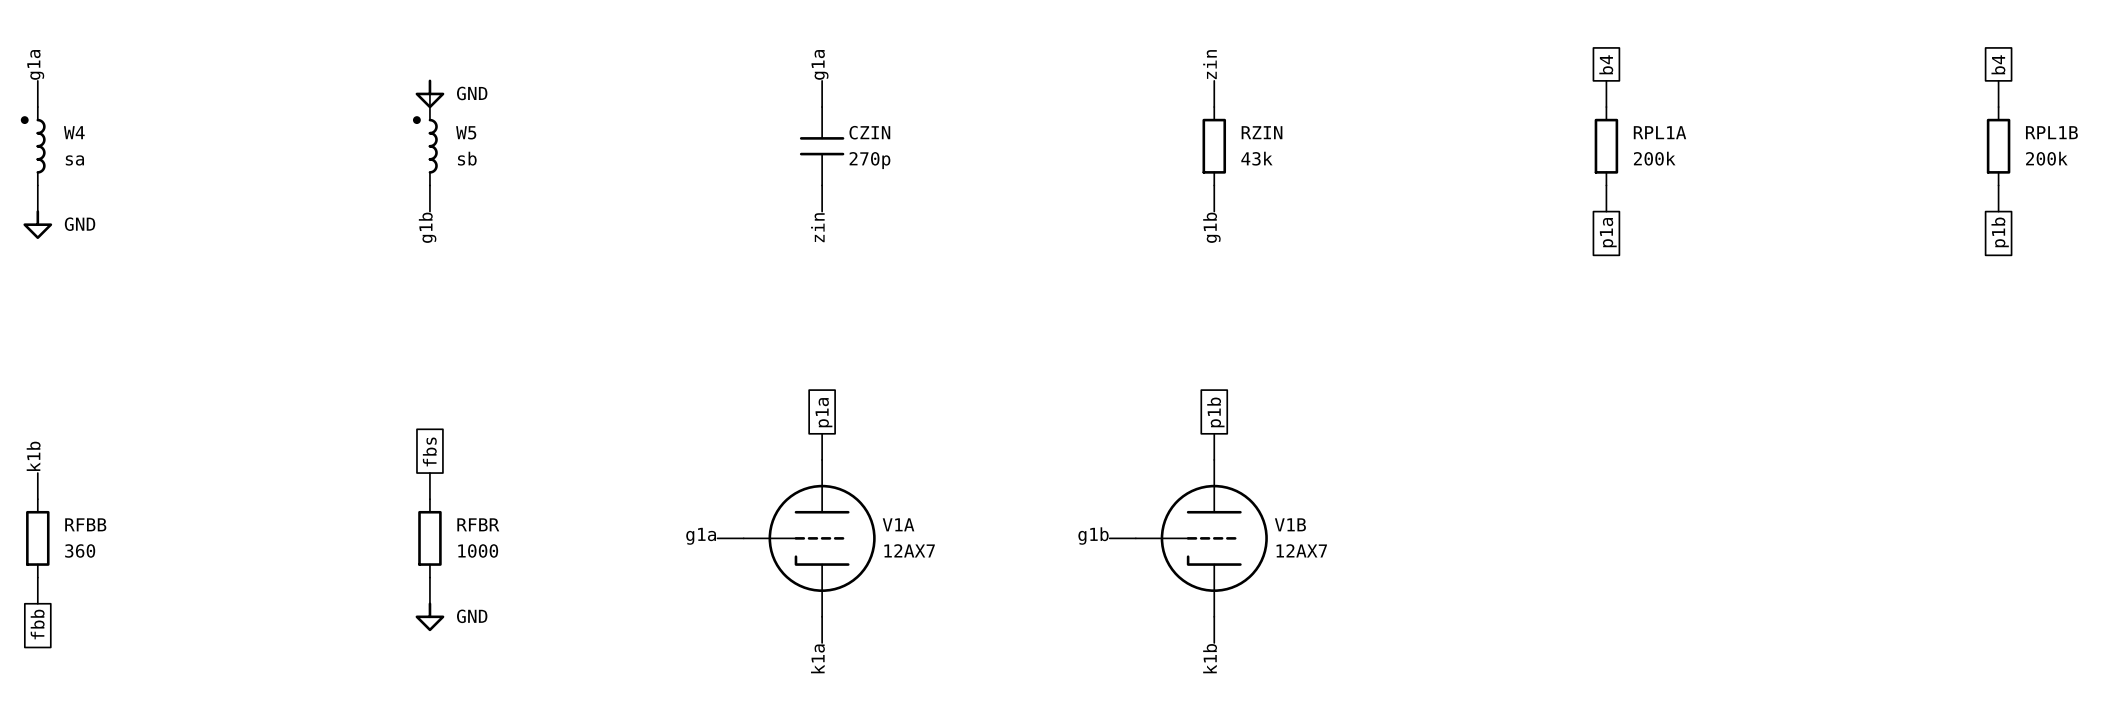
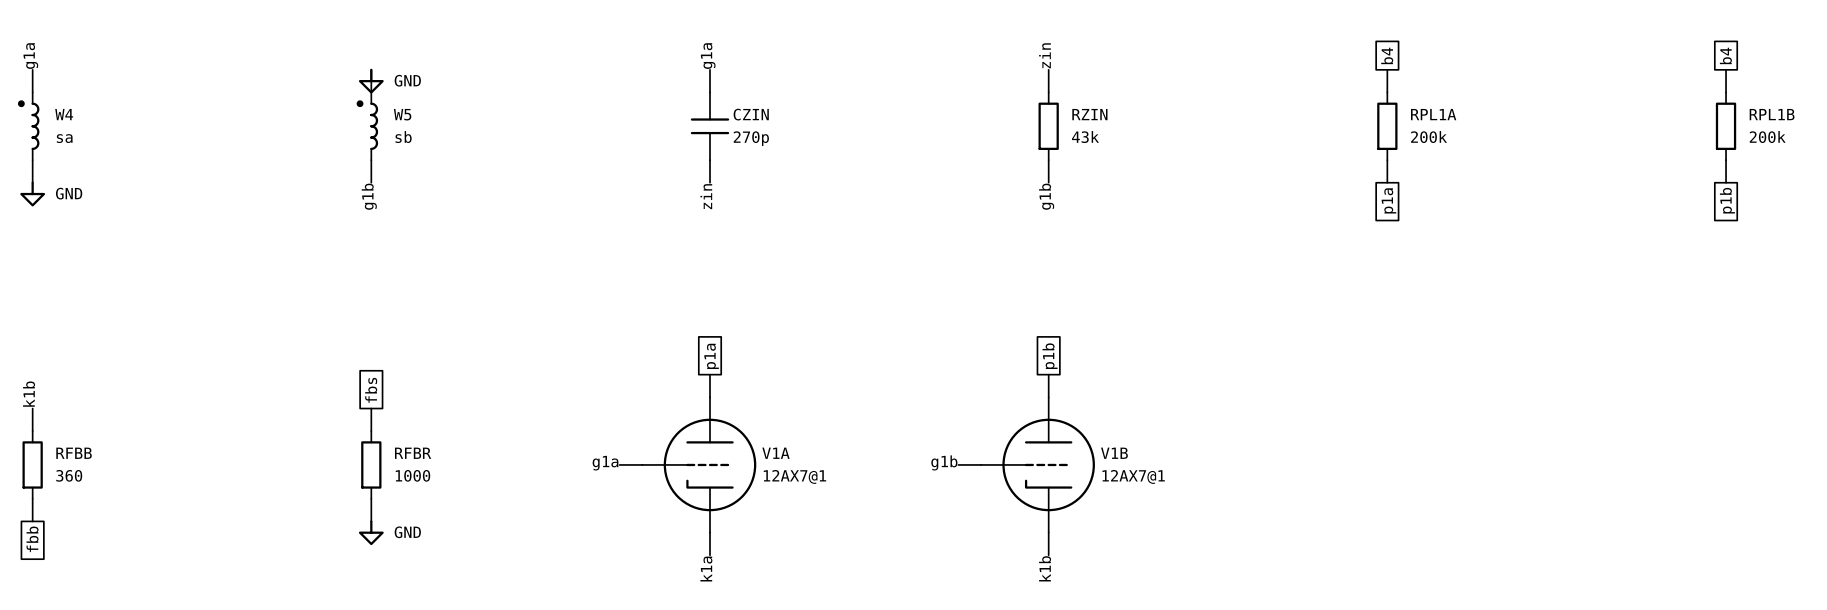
V1A value: 12AX7 (909, 550) -> 12AX7@1 (794, 476)
V1B value: 12AX7 (1301, 550) -> 12AX7@1 (1133, 476)

